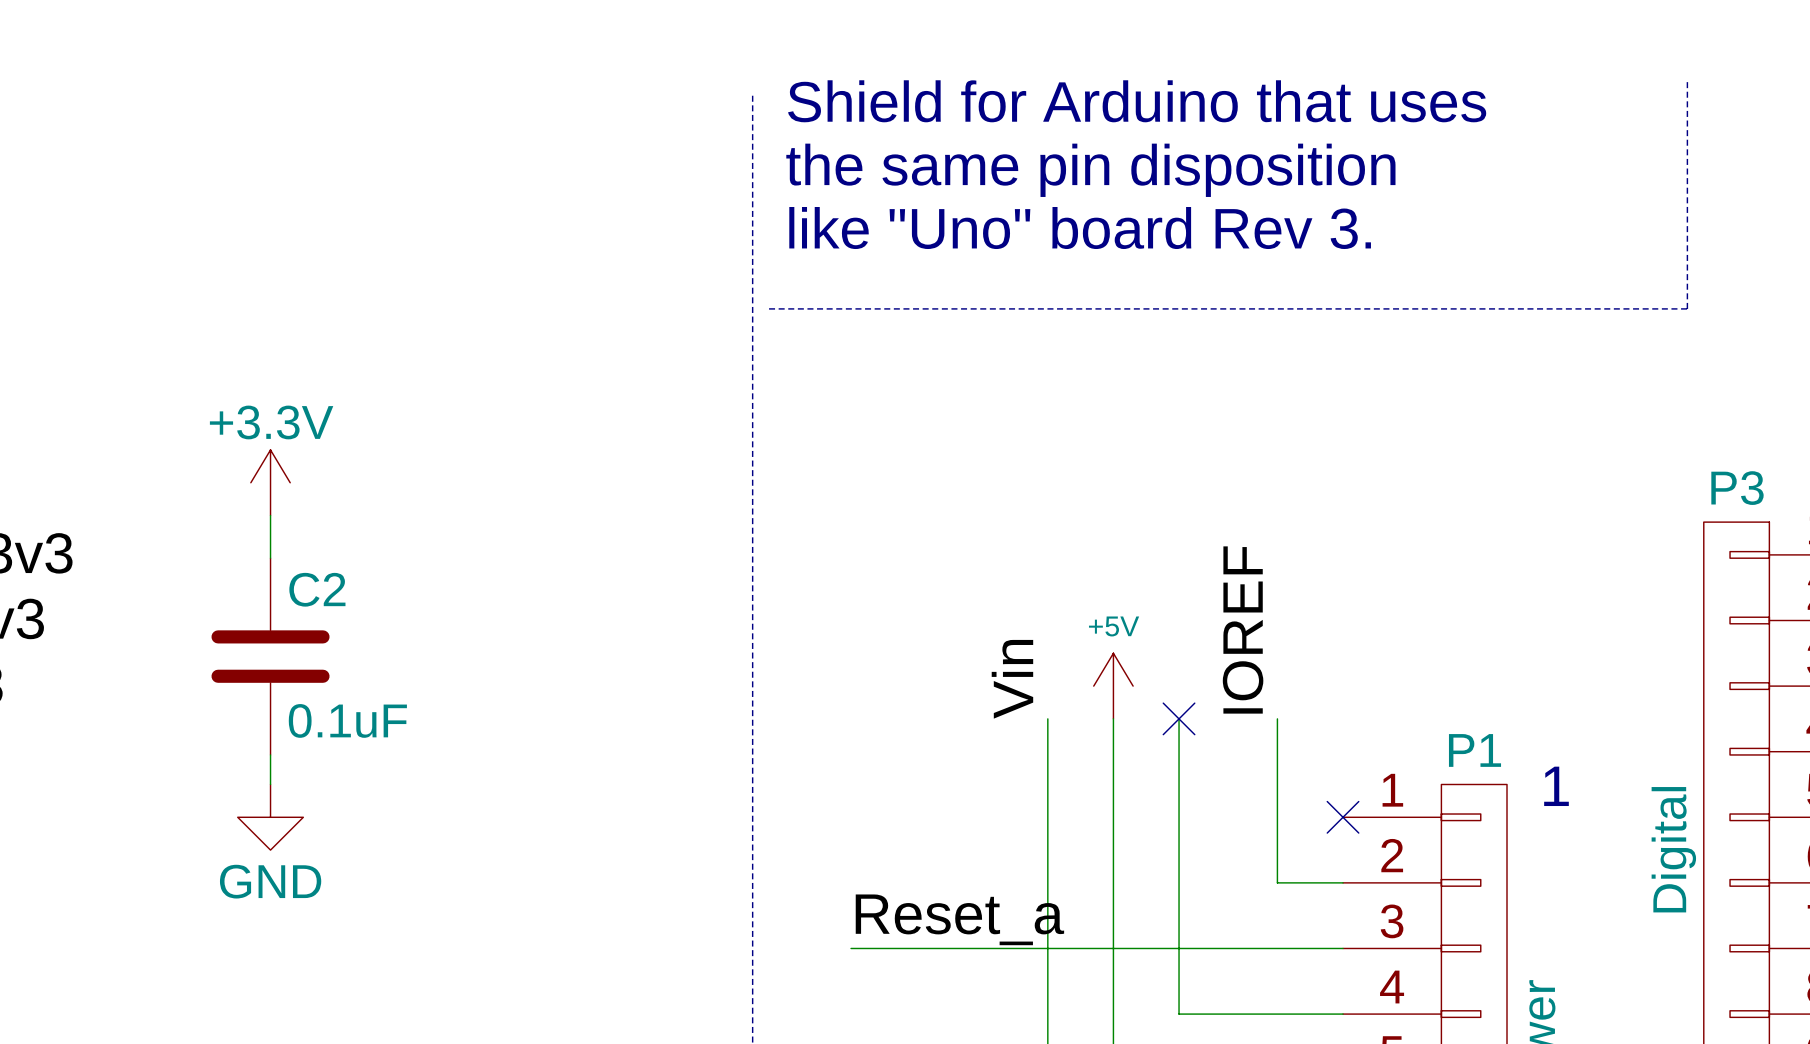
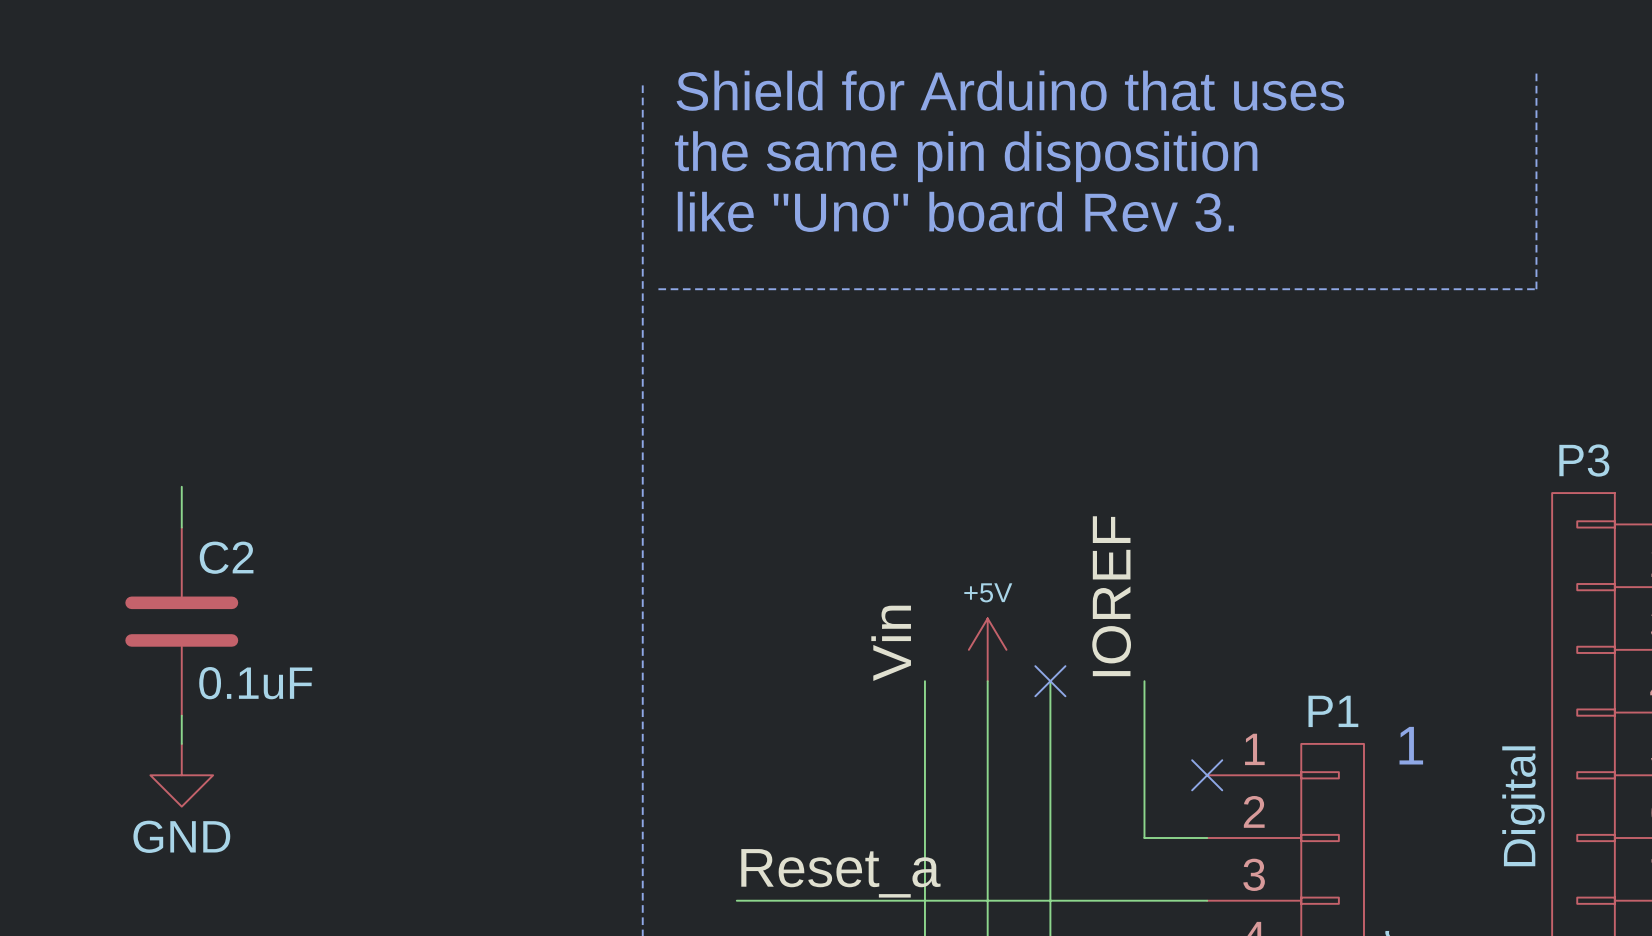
power symbol: +3.3V (270, 482) -> none

